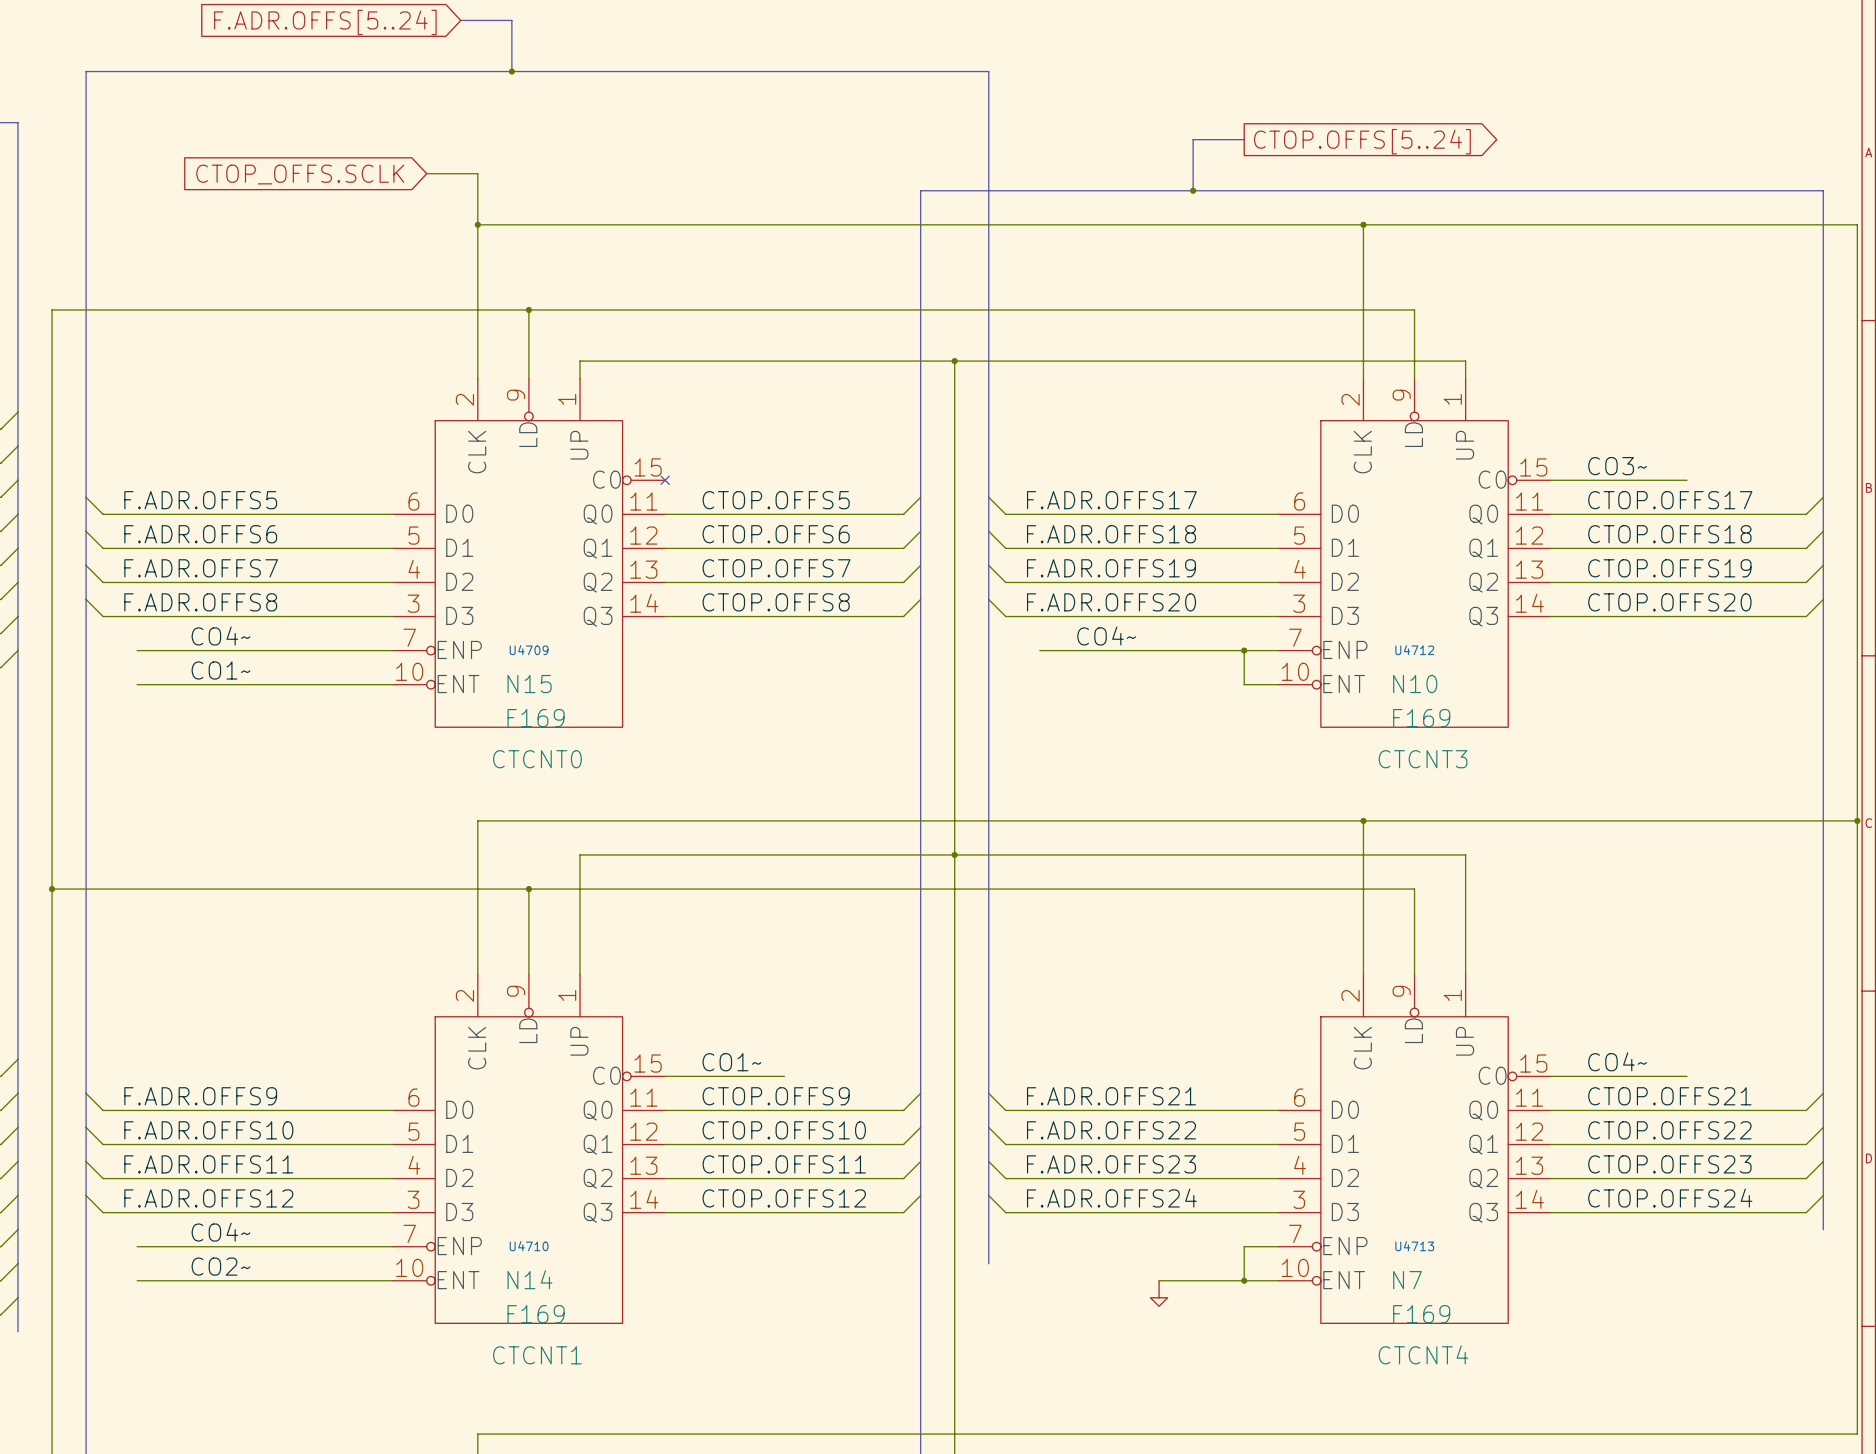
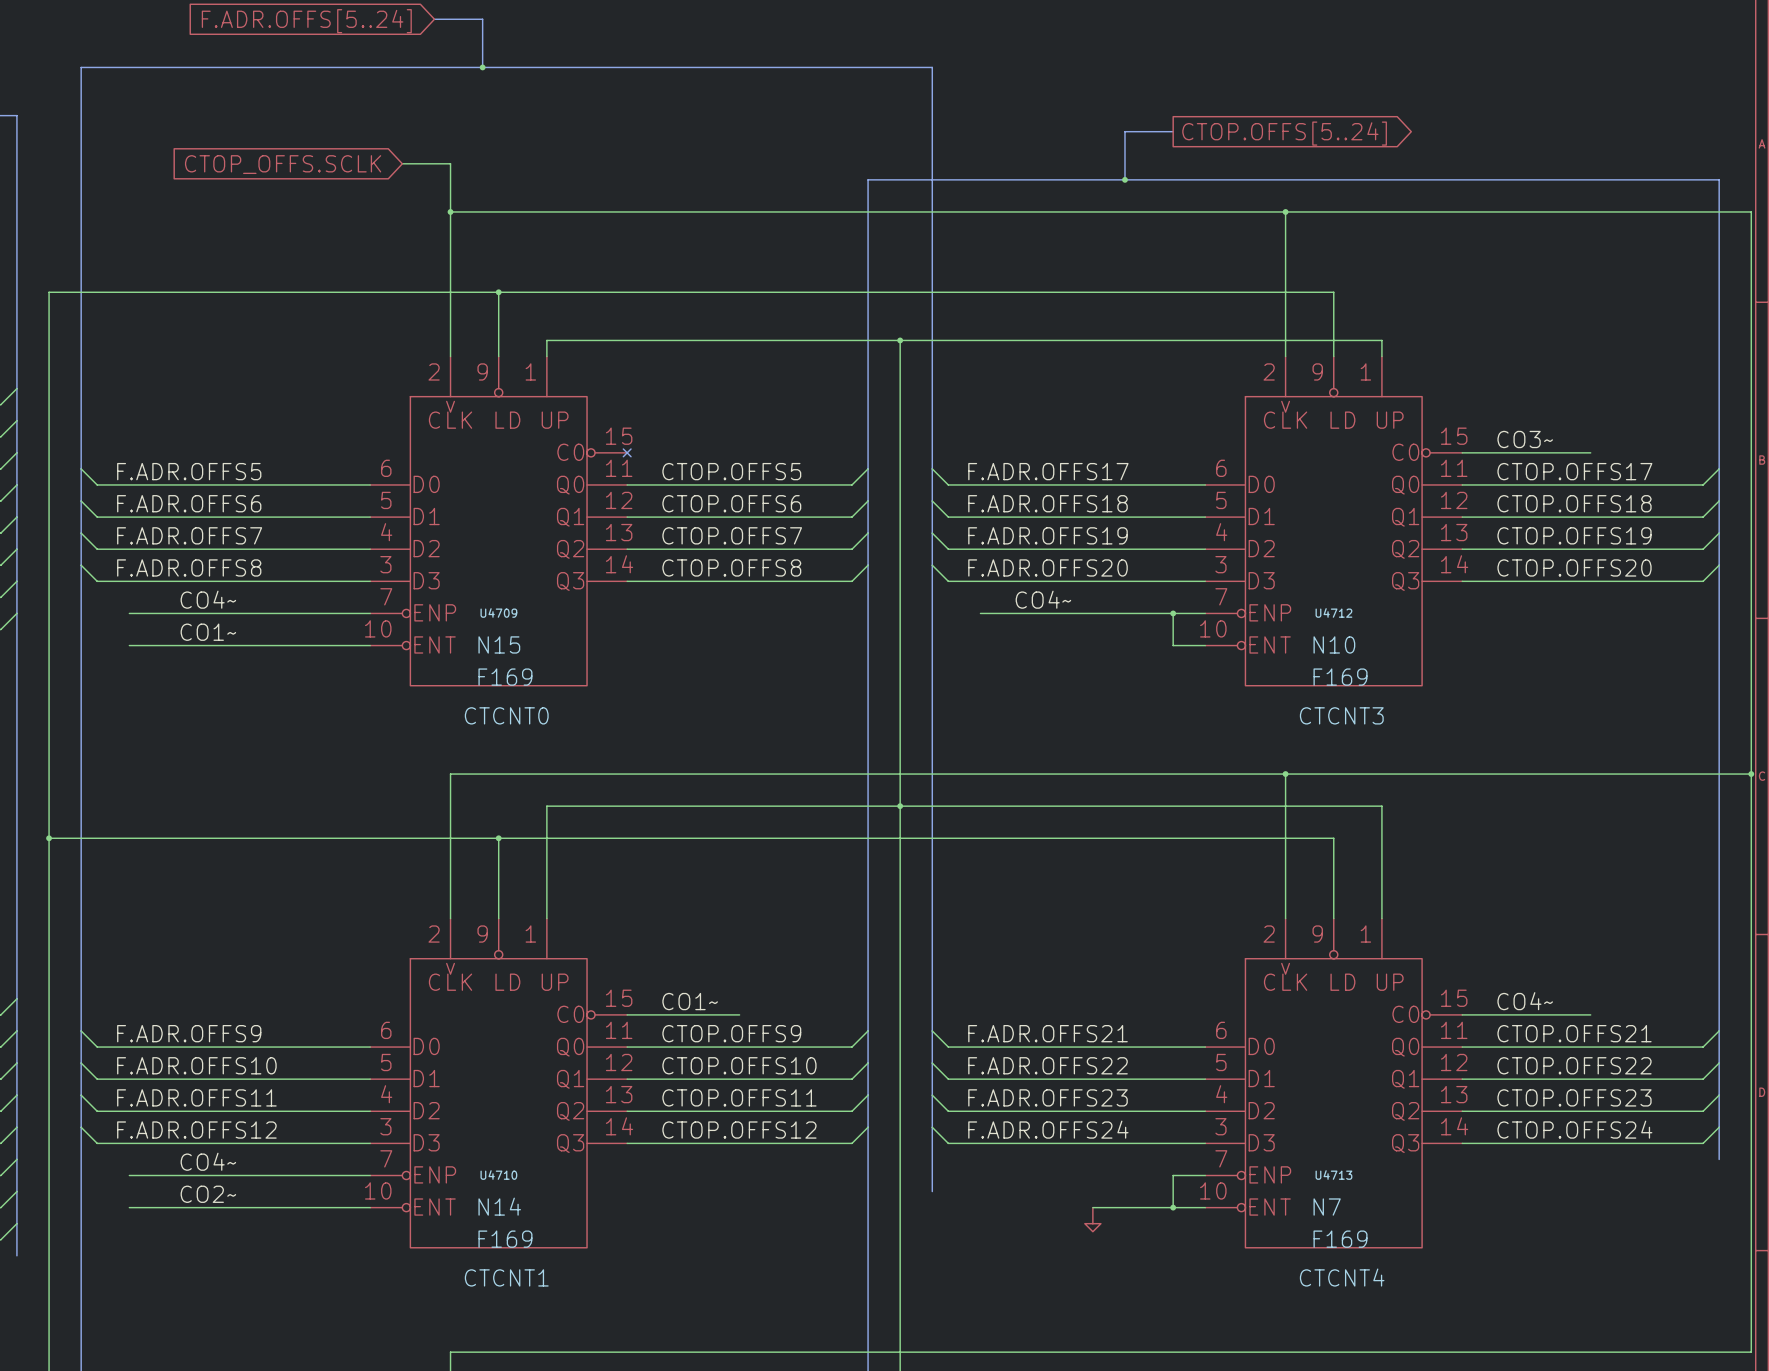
U4709 symbol: [392, 378, 666, 728] -> [370, 356, 628, 686]
U4712 symbol: [1278, 378, 1551, 728] -> [1205, 356, 1463, 686]
U4710 symbol: [392, 974, 666, 1324] -> [370, 918, 628, 1248]
U4713 symbol: [1278, 974, 1551, 1324] -> [1205, 918, 1463, 1248]

